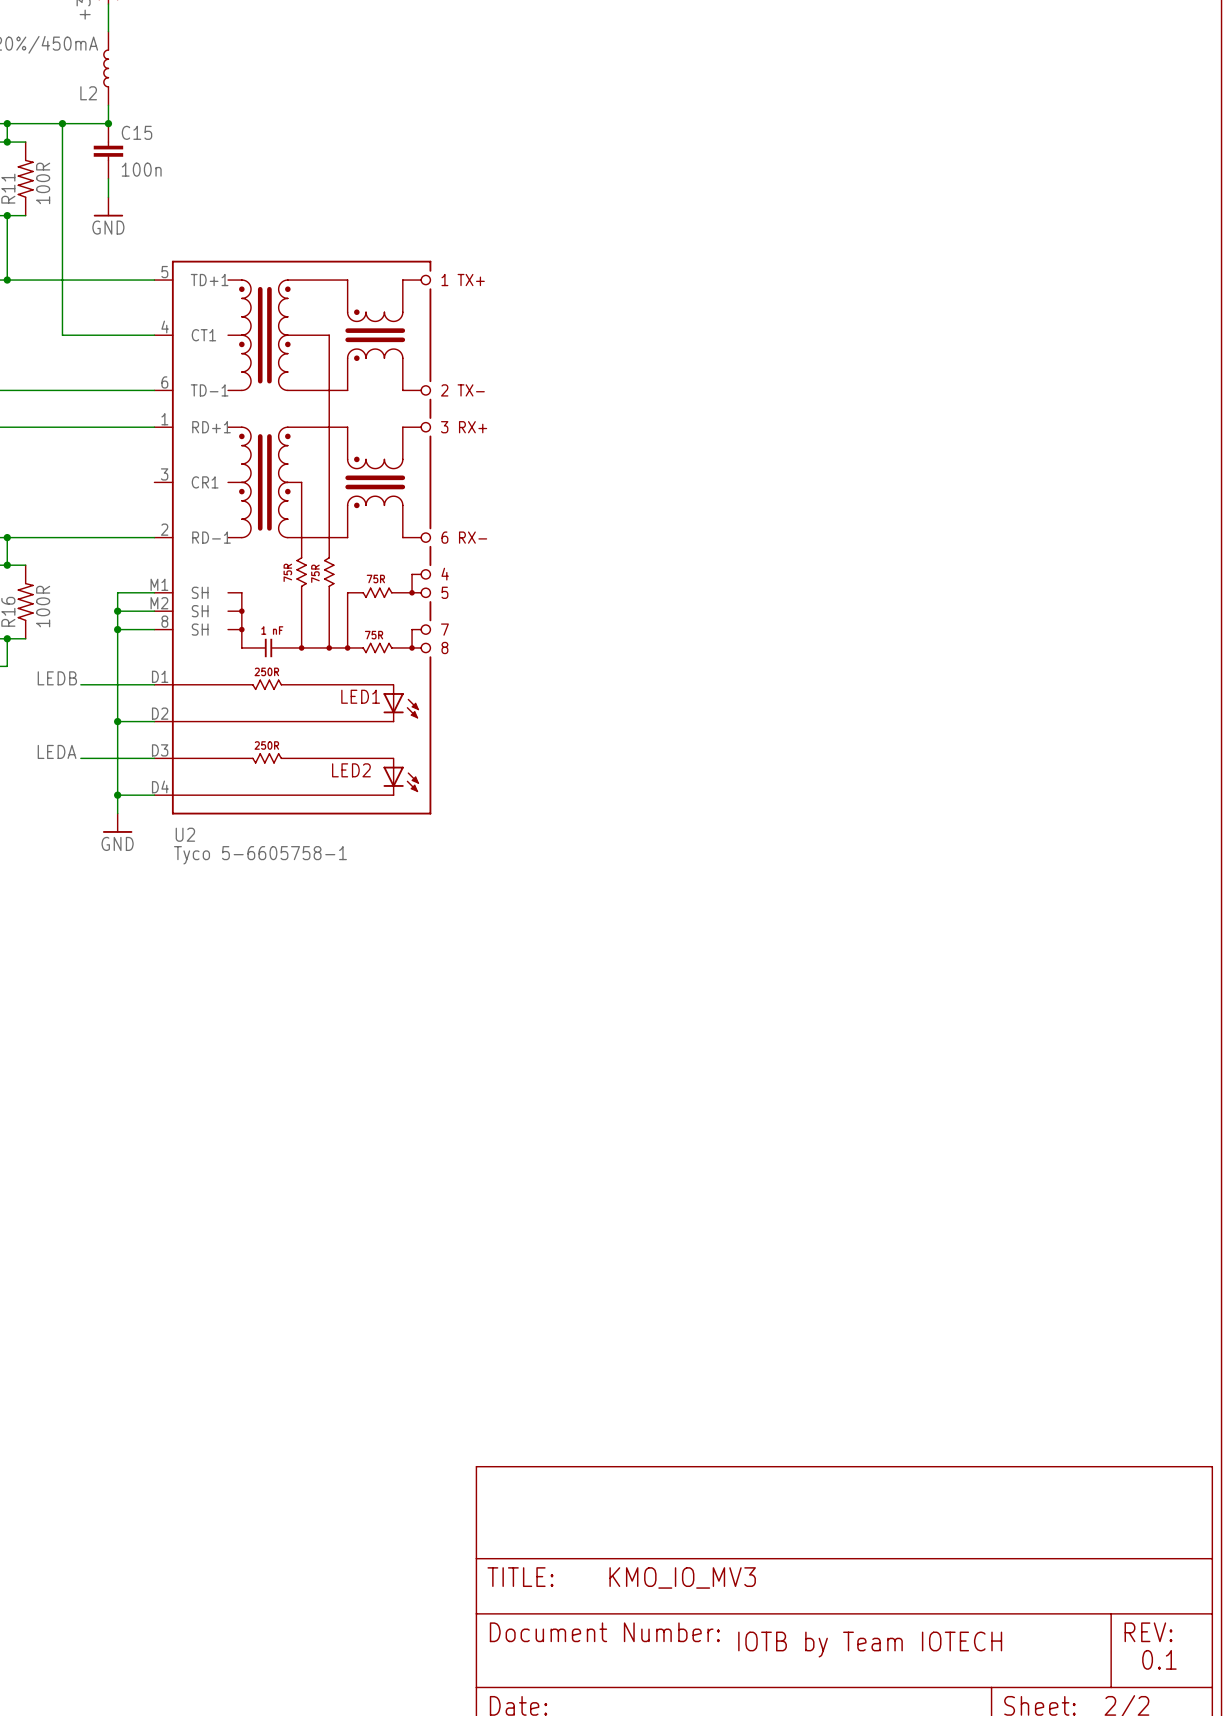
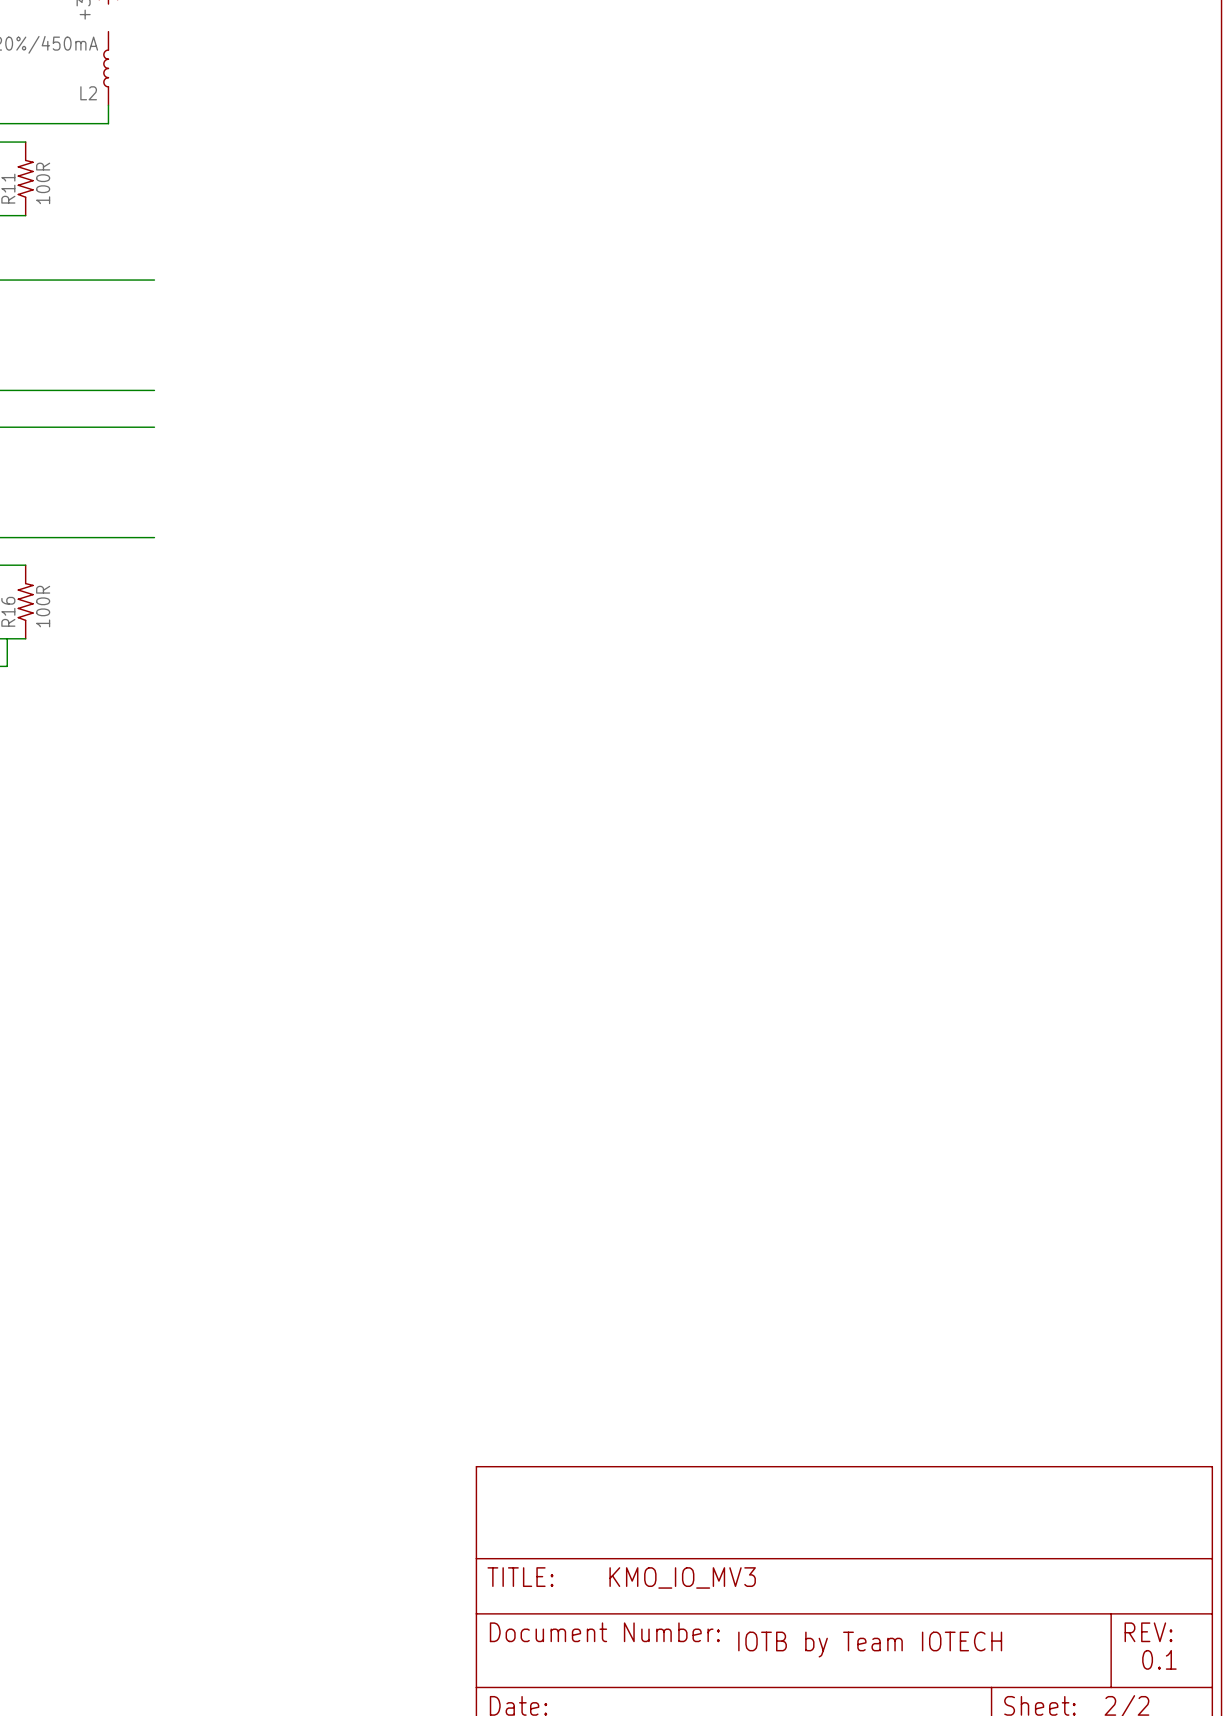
wire: (108, 4) (108, 31) -> none
wire: (7, 123) (7, 142) -> none
junction: (7, 123) -> none
wire: (62, 123) (62, 335) (154, 335) -> none
junction: (62, 123) -> none
junction: (108, 123) -> none
junction: (7, 142) -> none
C15: 100n (108, 151) -> none
wire: (108, 178) (108, 197) -> none
power symbol: GND (108, 206) -> none
wire: (7, 215) (7, 280) -> none
junction: (7, 215) -> none
junction: (7, 280) -> none
wire: (7, 537) (7, 565) -> none
junction: (7, 537) -> none
U2: Tyco 5-6605758-1 (292, 537) -> none
junction: (7, 565) -> none
wire: (154, 592) (117, 592) (117, 813) -> none
wire: (117, 611) (154, 611) -> none
junction: (117, 611) -> none
wire: (117, 629) (154, 629) -> none
junction: (117, 629) -> none
junction: (7, 638) -> none
label: LEDB (57, 678) -> none
wire: (80, 684) (154, 684) -> none
wire: (117, 721) (154, 721) -> none
junction: (117, 721) -> none
label: LEDA (57, 751) -> none
wire: (80, 758) (154, 758) -> none
wire: (117, 795) (154, 795) -> none
junction: (117, 795) -> none
power symbol: GND (117, 823) -> none

